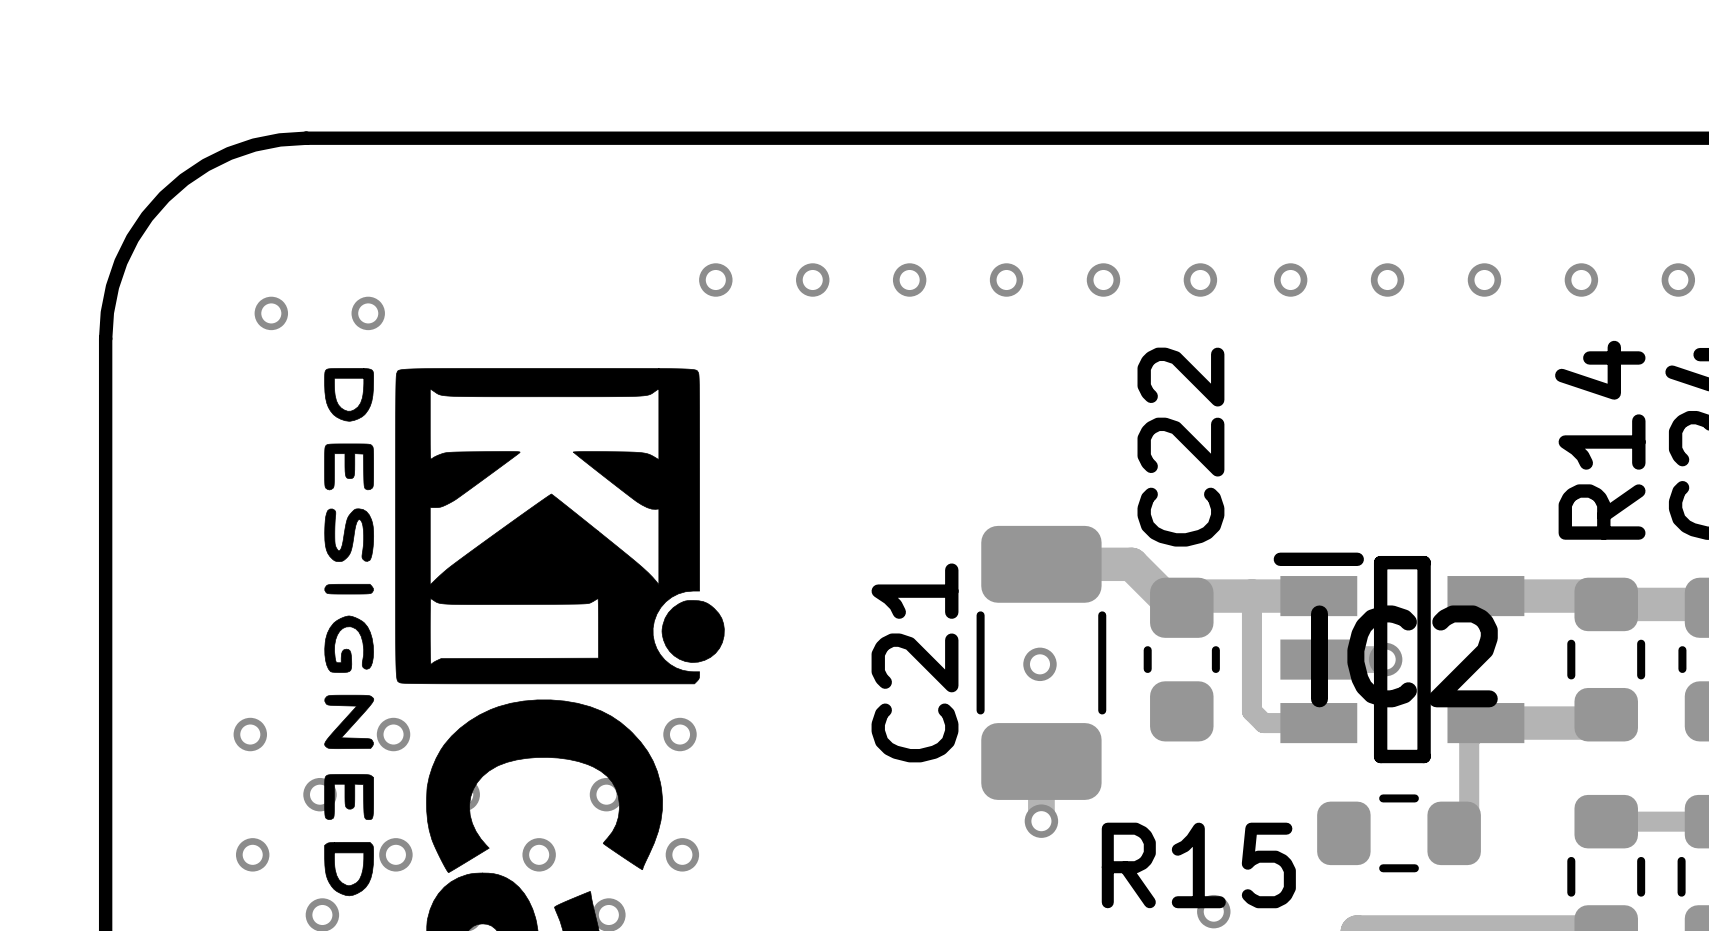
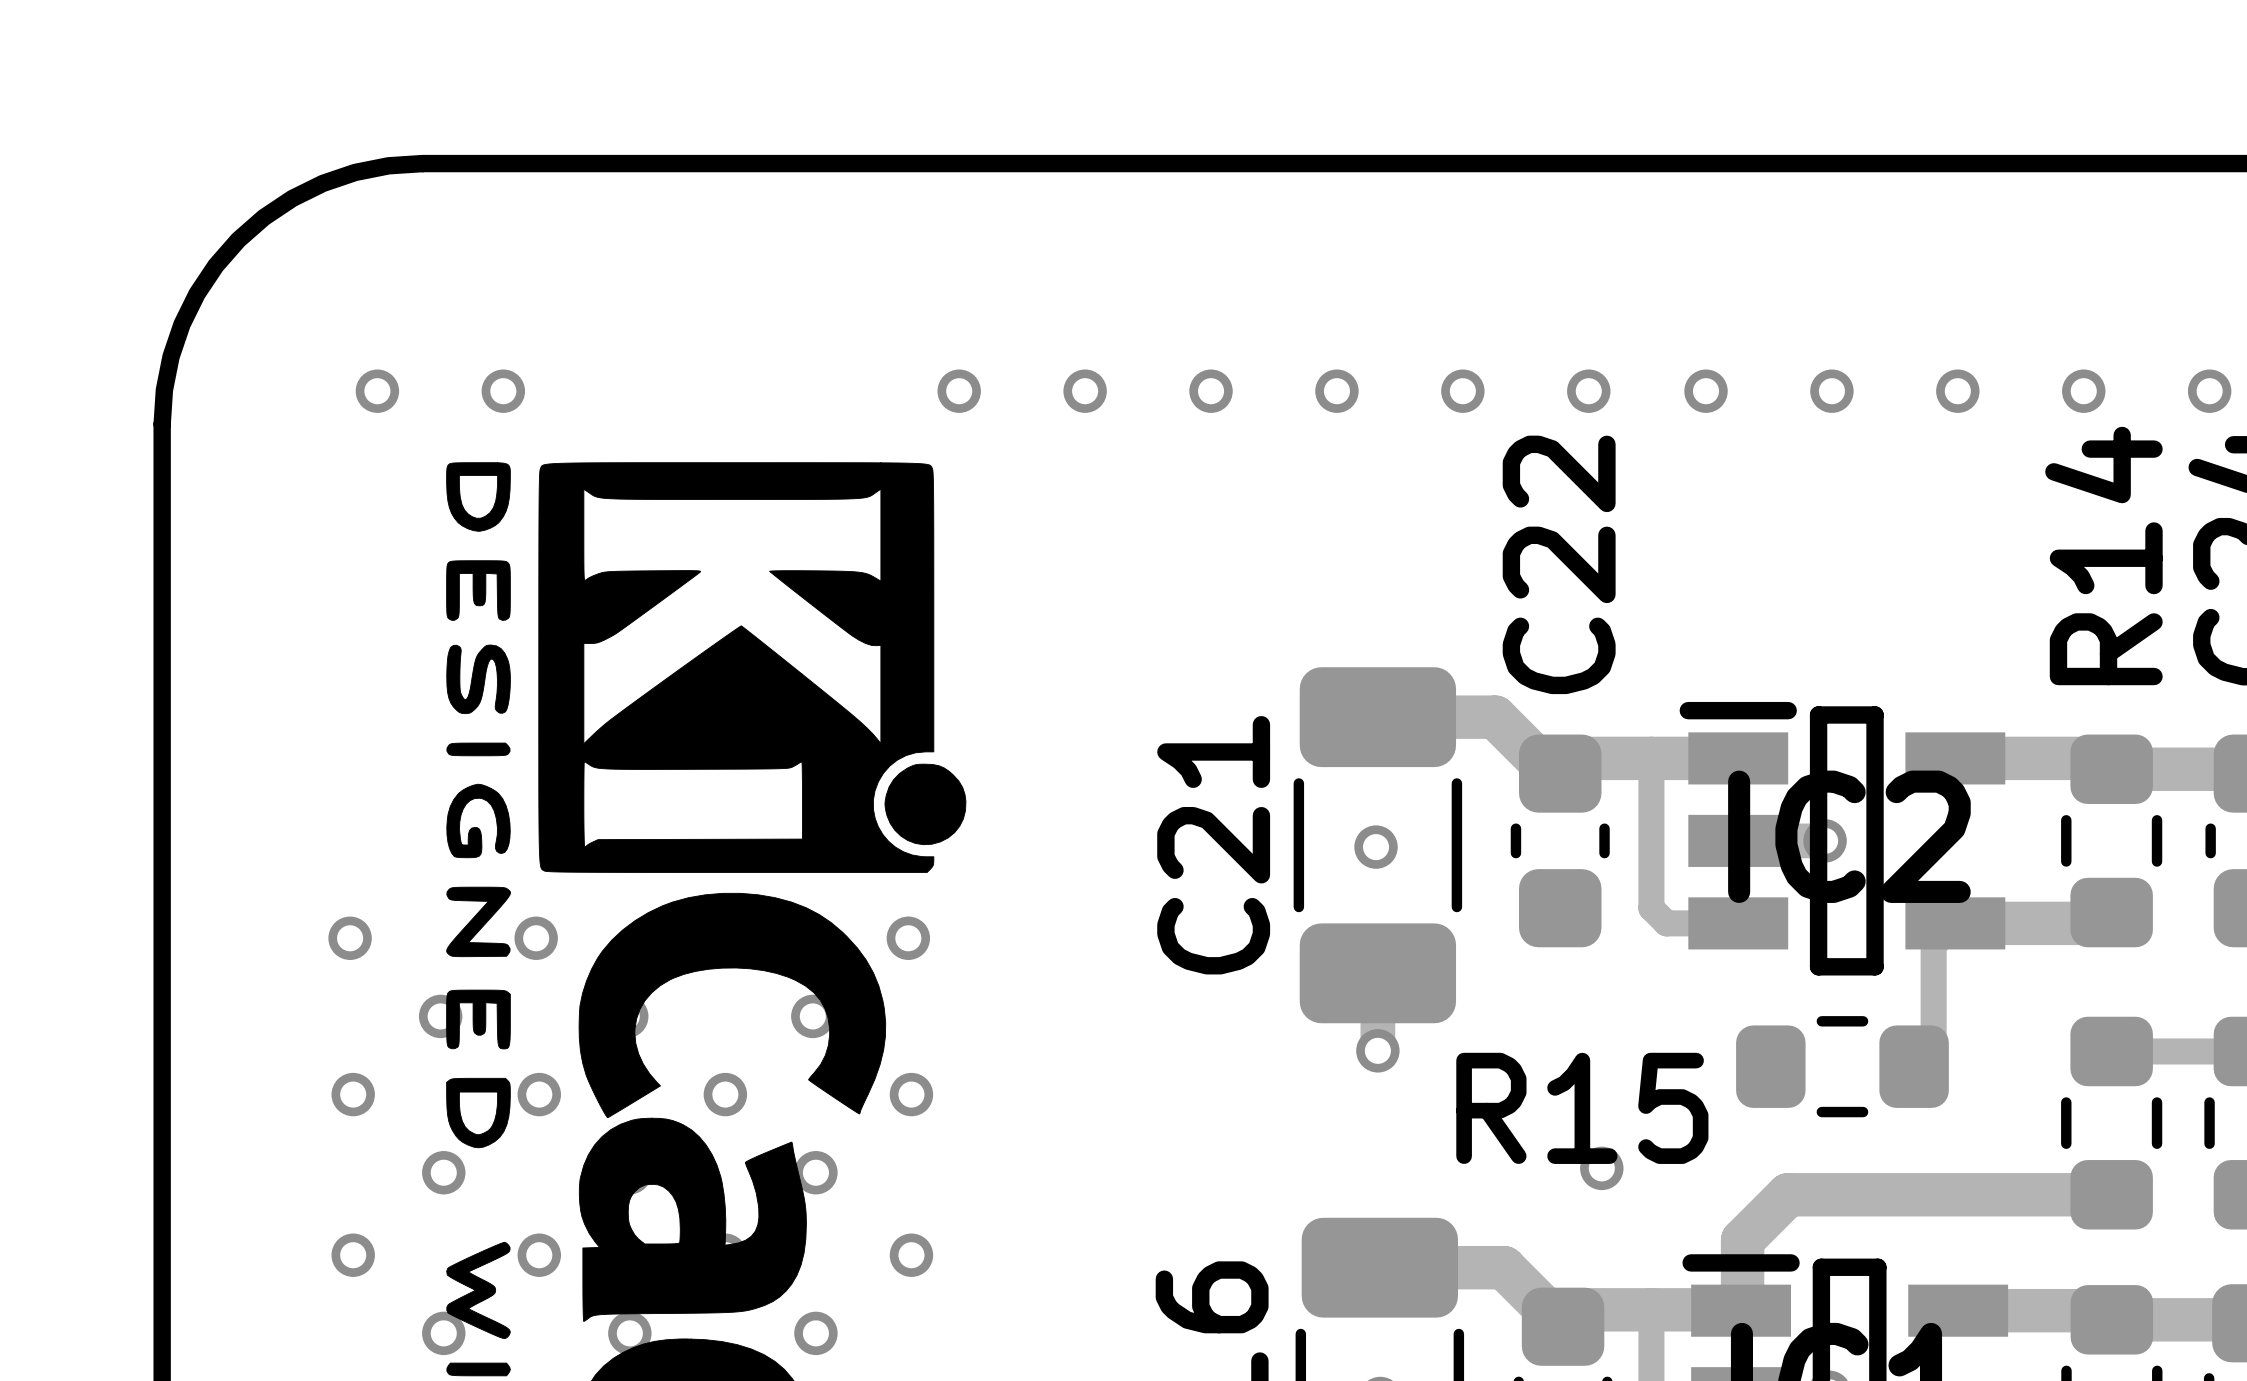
via position: (715, 280) -> (959, 391)
via position: (812, 280) -> (1085, 391)
via position: (909, 280) -> (1211, 391)
via position: (1006, 280) -> (1336, 391)
via position: (1103, 280) -> (1462, 391)
via position: (1200, 280) -> (1588, 391)
via position: (1290, 280) -> (1706, 391)
via position: (1387, 280) -> (1831, 391)
via position: (1484, 280) -> (1957, 391)
via position: (1581, 280) -> (2083, 391)
via position: (1678, 280) -> (2209, 391)

